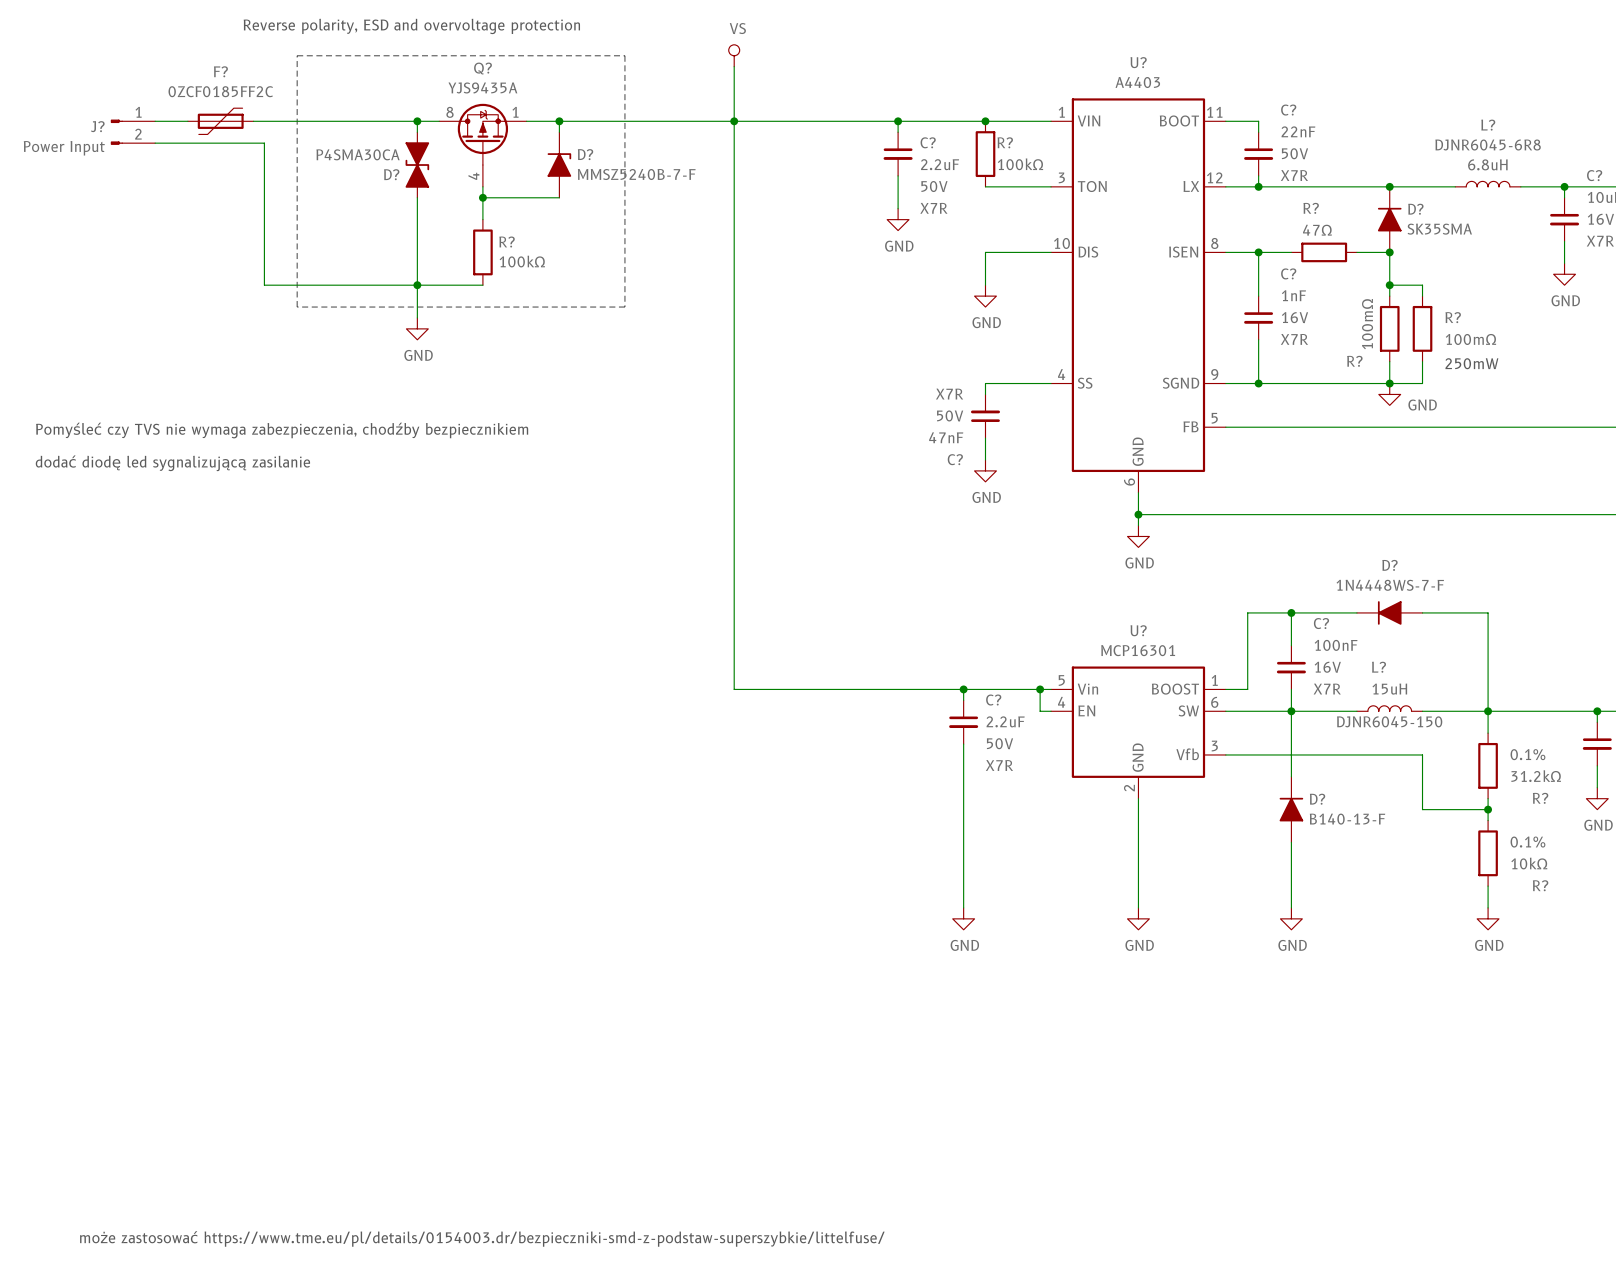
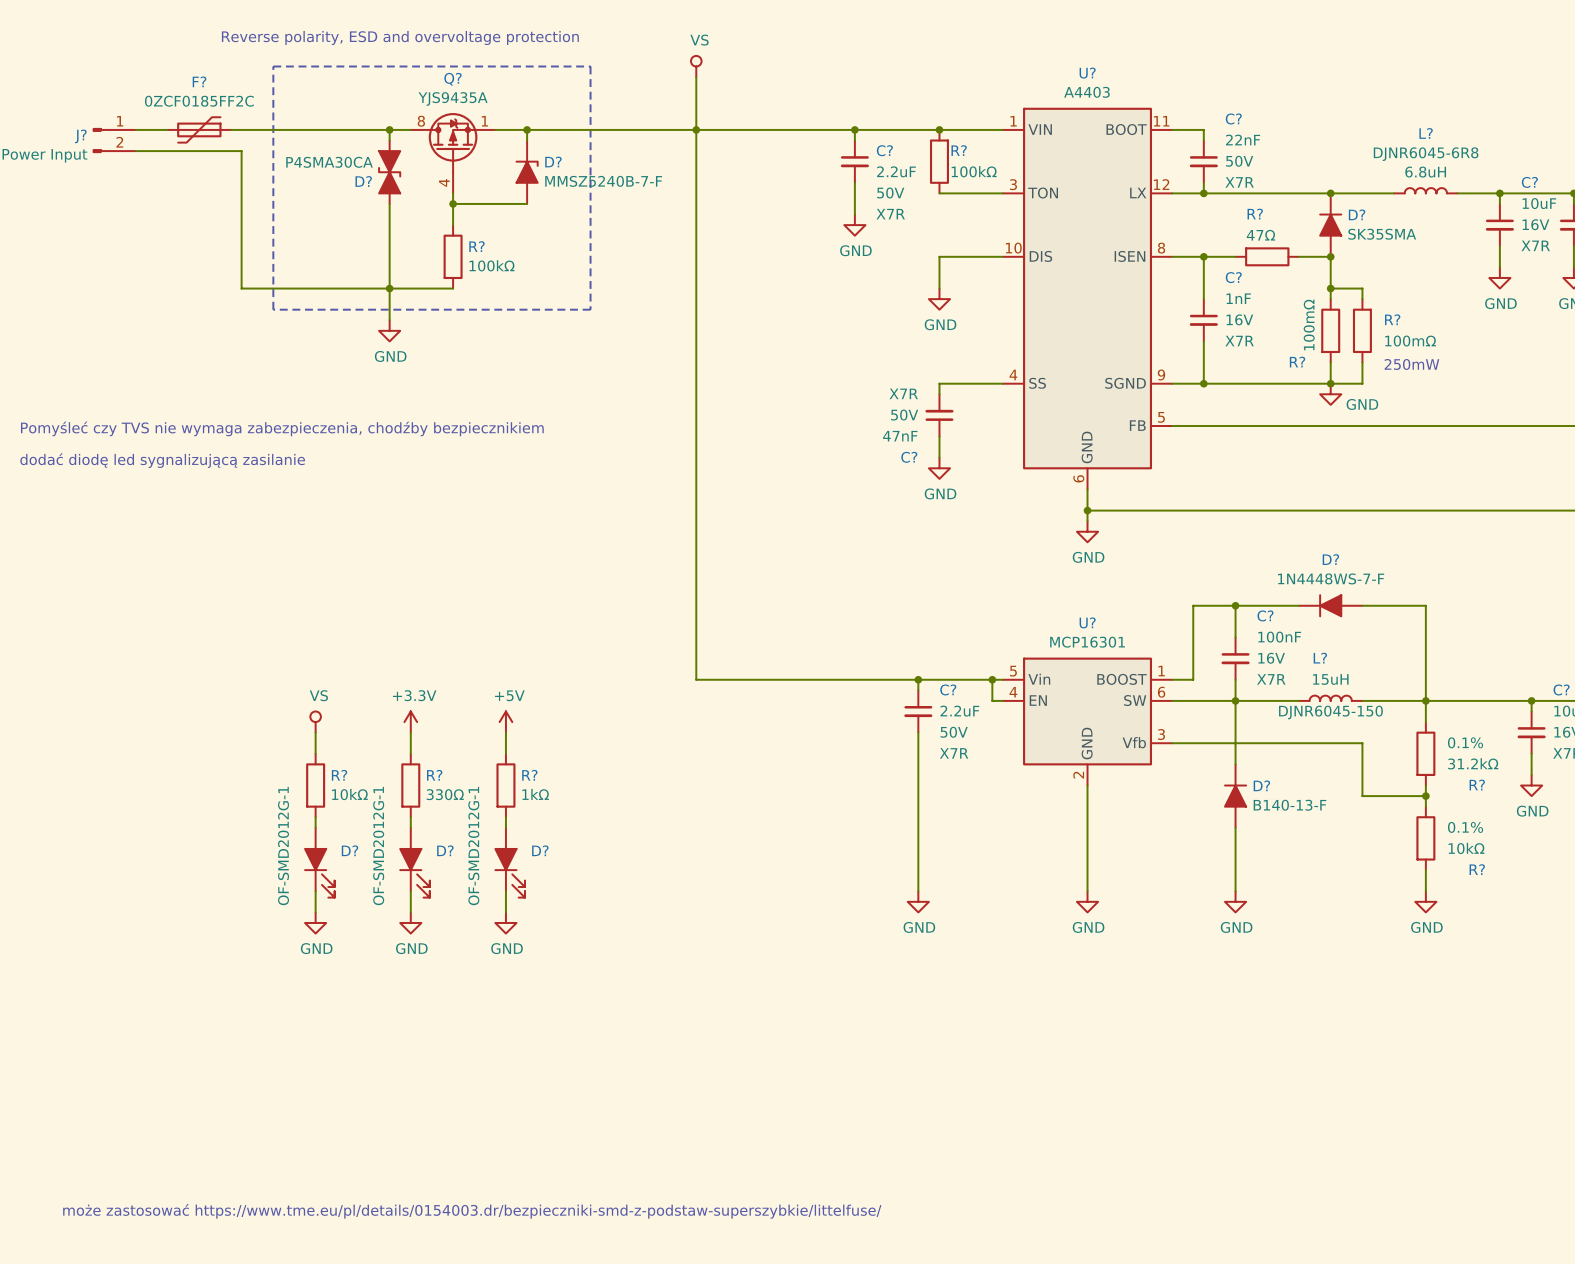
power symbol: none -> VS (315, 722)
power symbol: none -> +3.3V (410, 722)
power symbol: none -> +5V (505, 722)
wire: none -> (315, 732) (315, 753)
wire: none -> (410, 732) (410, 753)
wire: none -> (505, 732) (505, 753)
R?: none -> 10kΩ (315, 785)
R?: none -> 330Ω (410, 785)
R?: none -> 1kΩ (505, 785)
wire: none -> (315, 817) (315, 827)
wire: none -> (410, 817) (410, 827)
wire: none -> (505, 817) (505, 827)
D?: none -> OF-SMD2012G-1 (319, 862)
D?: none -> OF-SMD2012G-1 (414, 862)
D?: none -> OF-SMD2012G-1 (509, 862)
wire: none -> (315, 891) (315, 912)
wire: none -> (410, 891) (410, 912)
wire: none -> (505, 891) (505, 912)
power symbol: none -> GND (315, 922)
power symbol: none -> GND (410, 922)
power symbol: none -> GND (505, 922)

